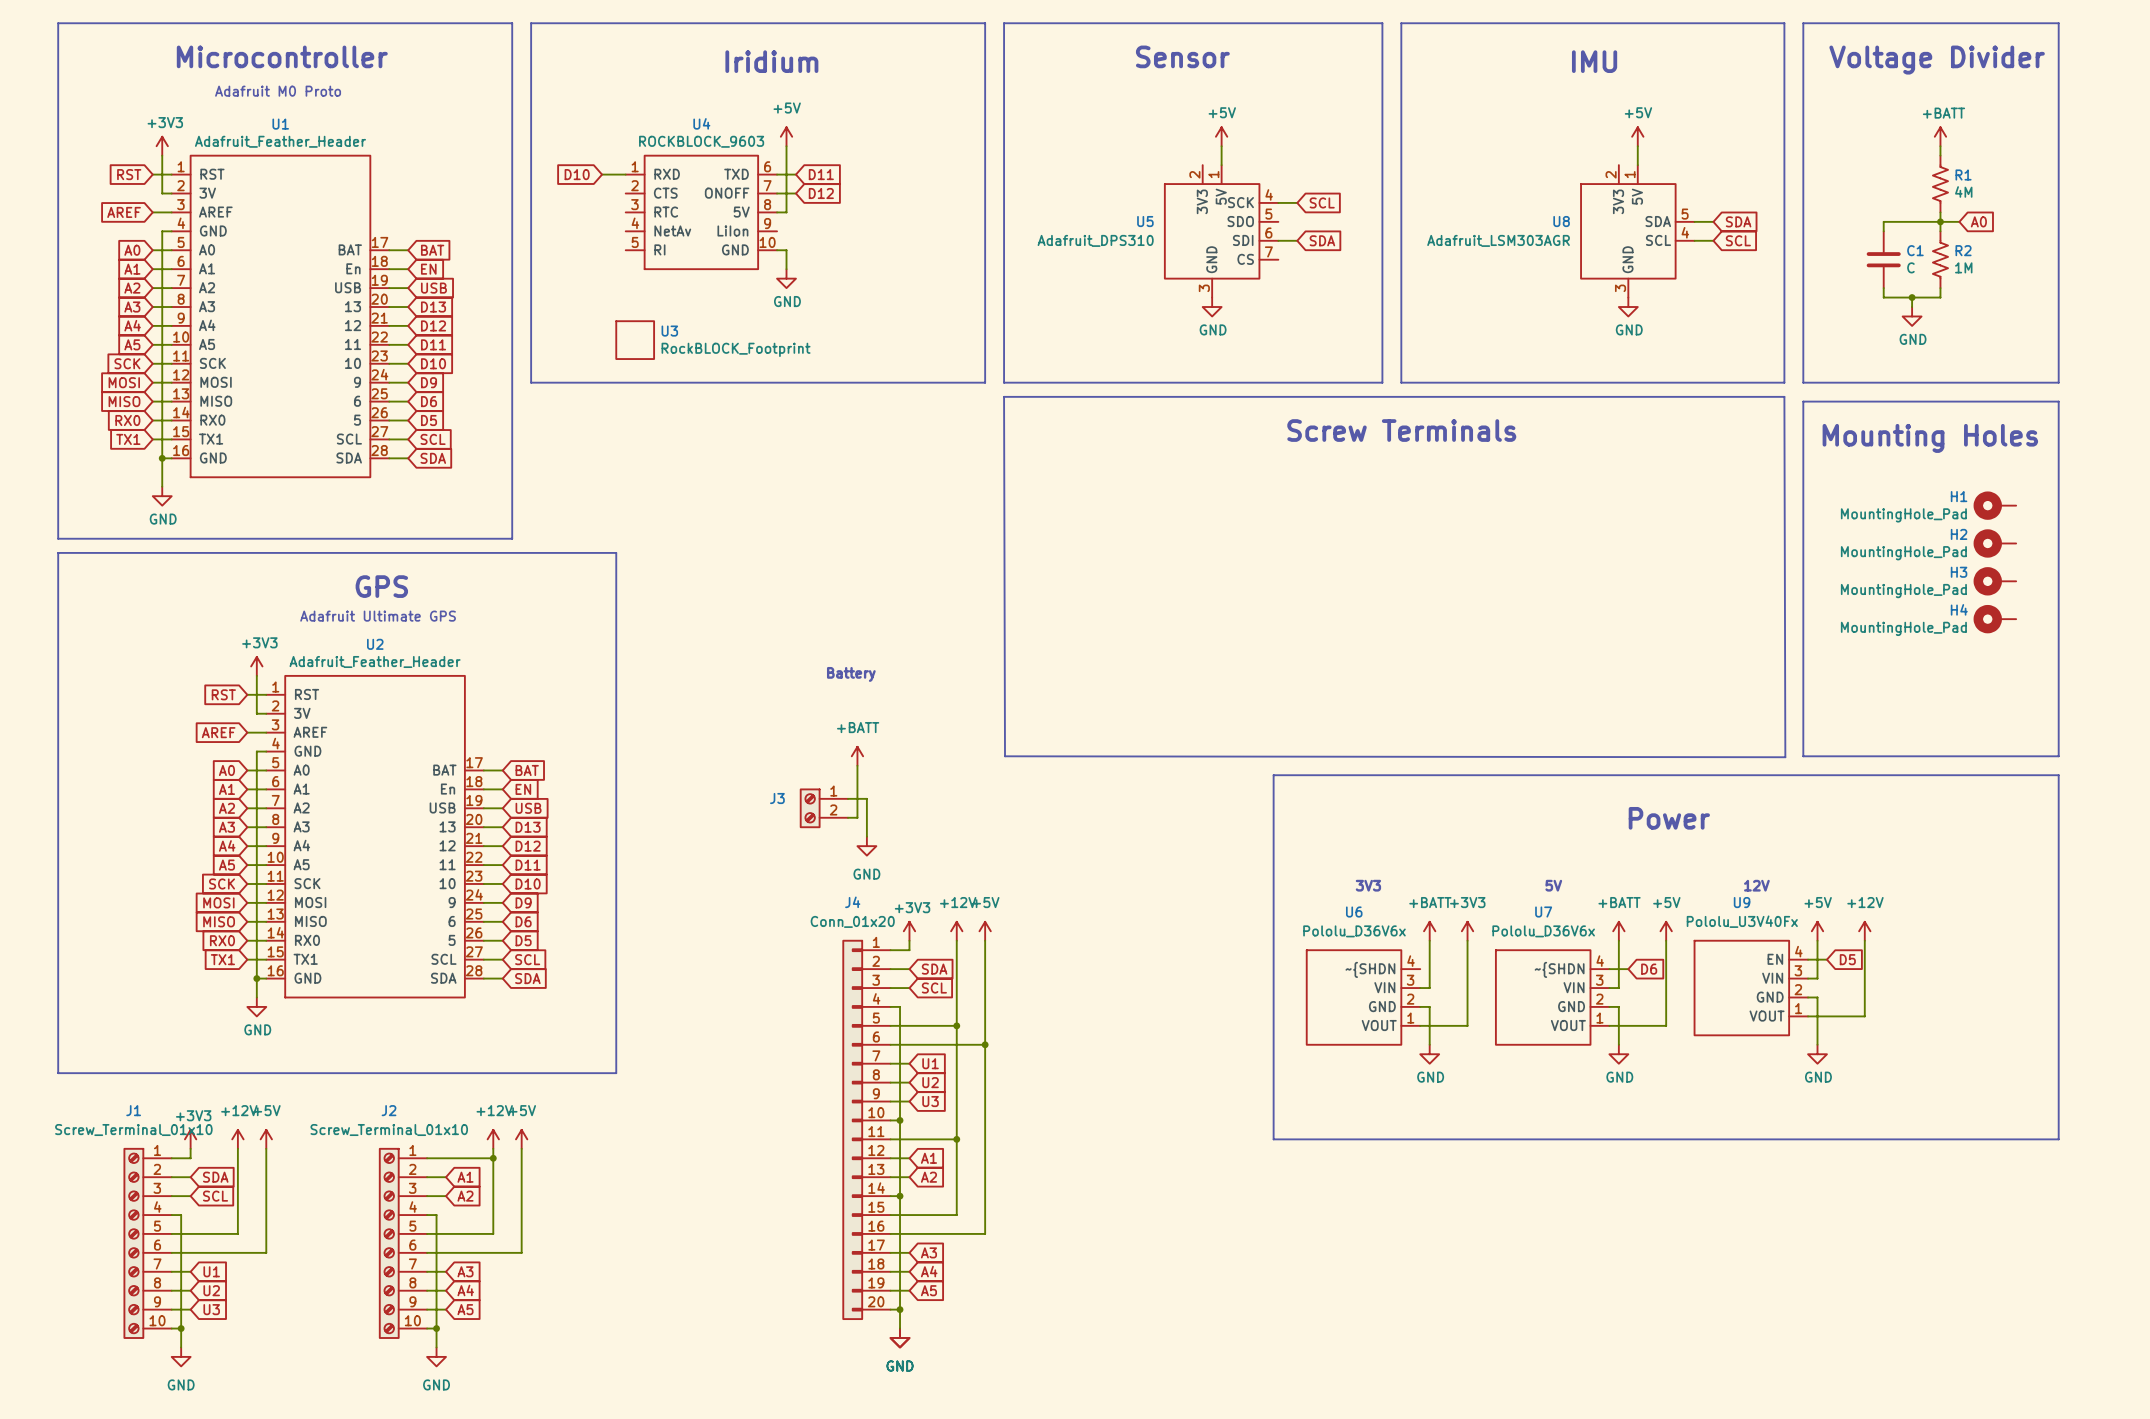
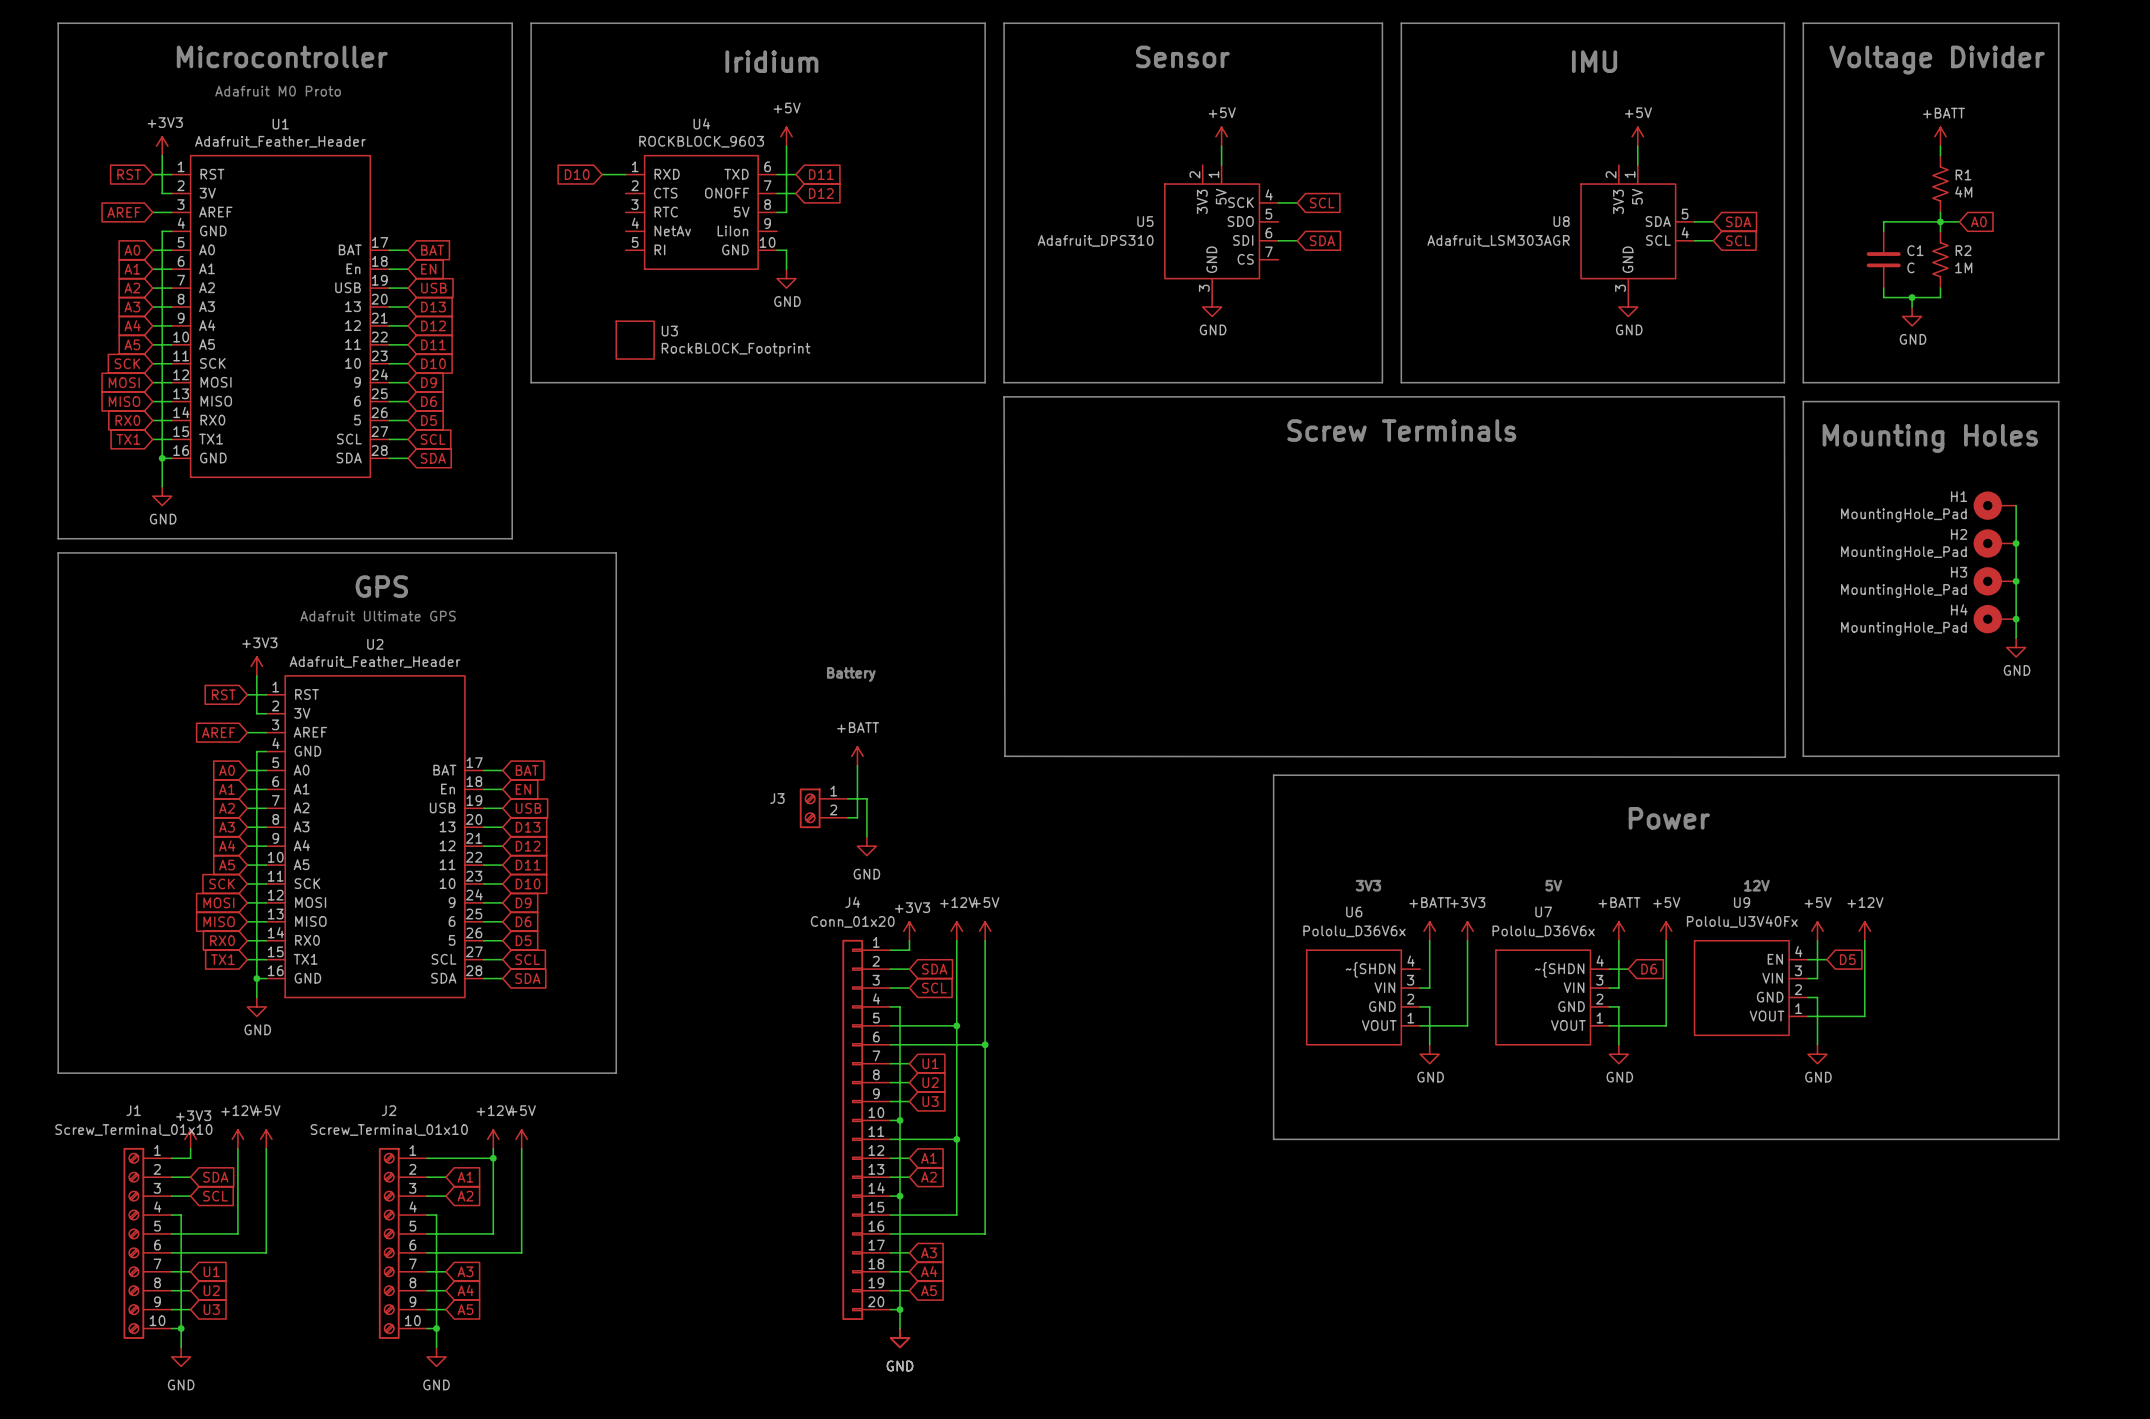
wire: none -> (2016, 505) (2016, 638)
junction: none -> (2016, 543)
junction: none -> (2016, 581)
junction: none -> (2016, 619)
power symbol: none -> GND (2016, 647)

